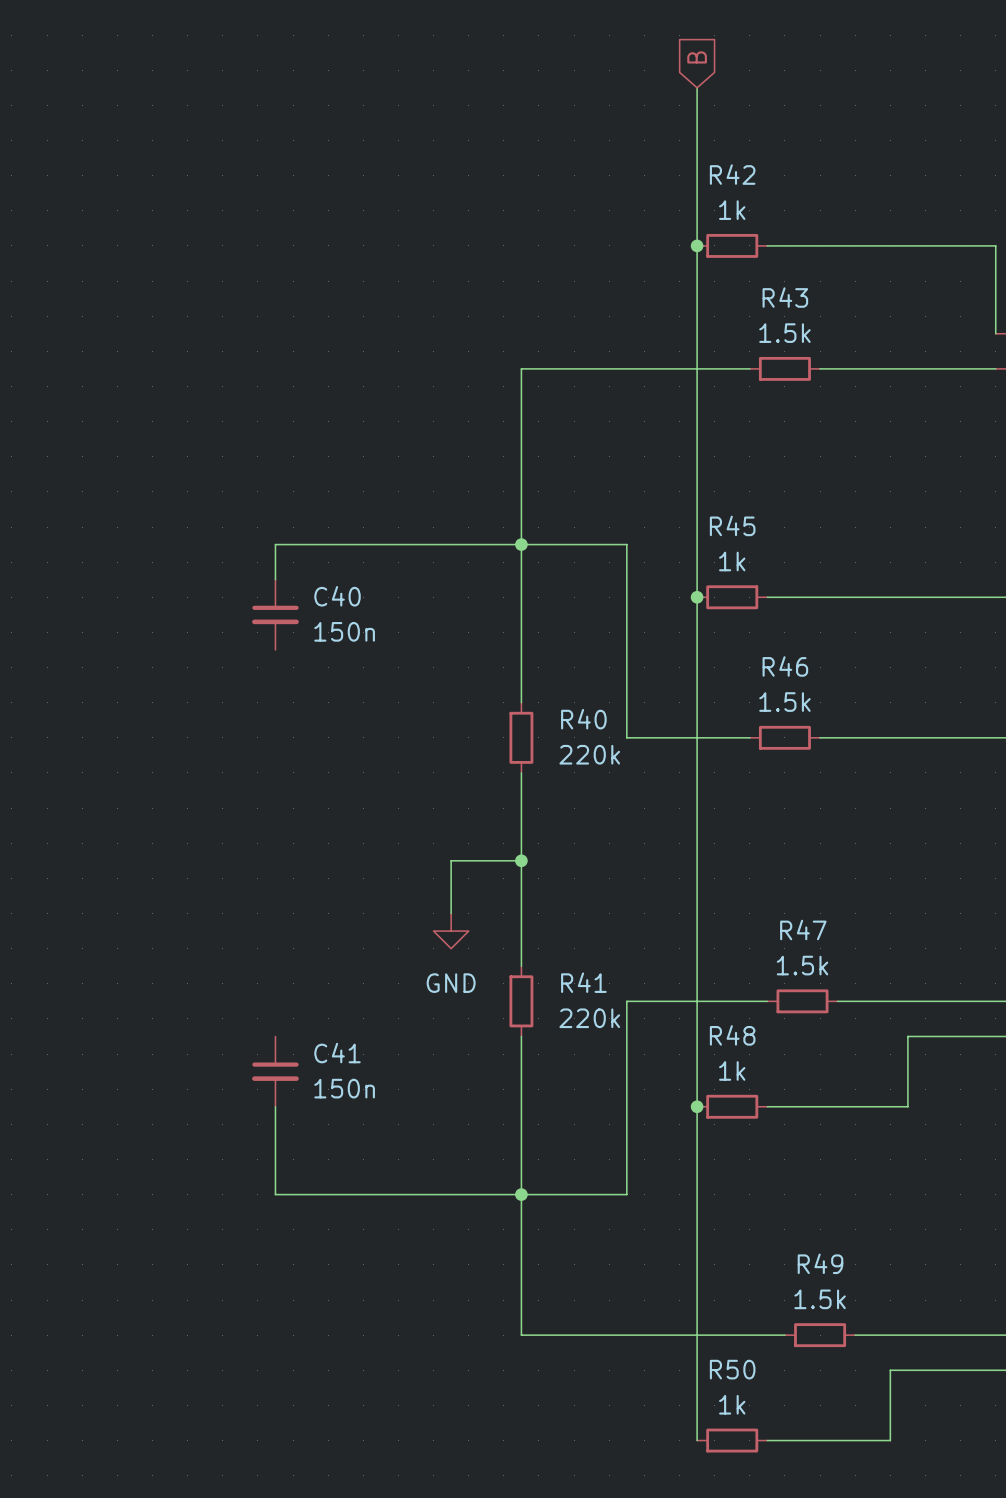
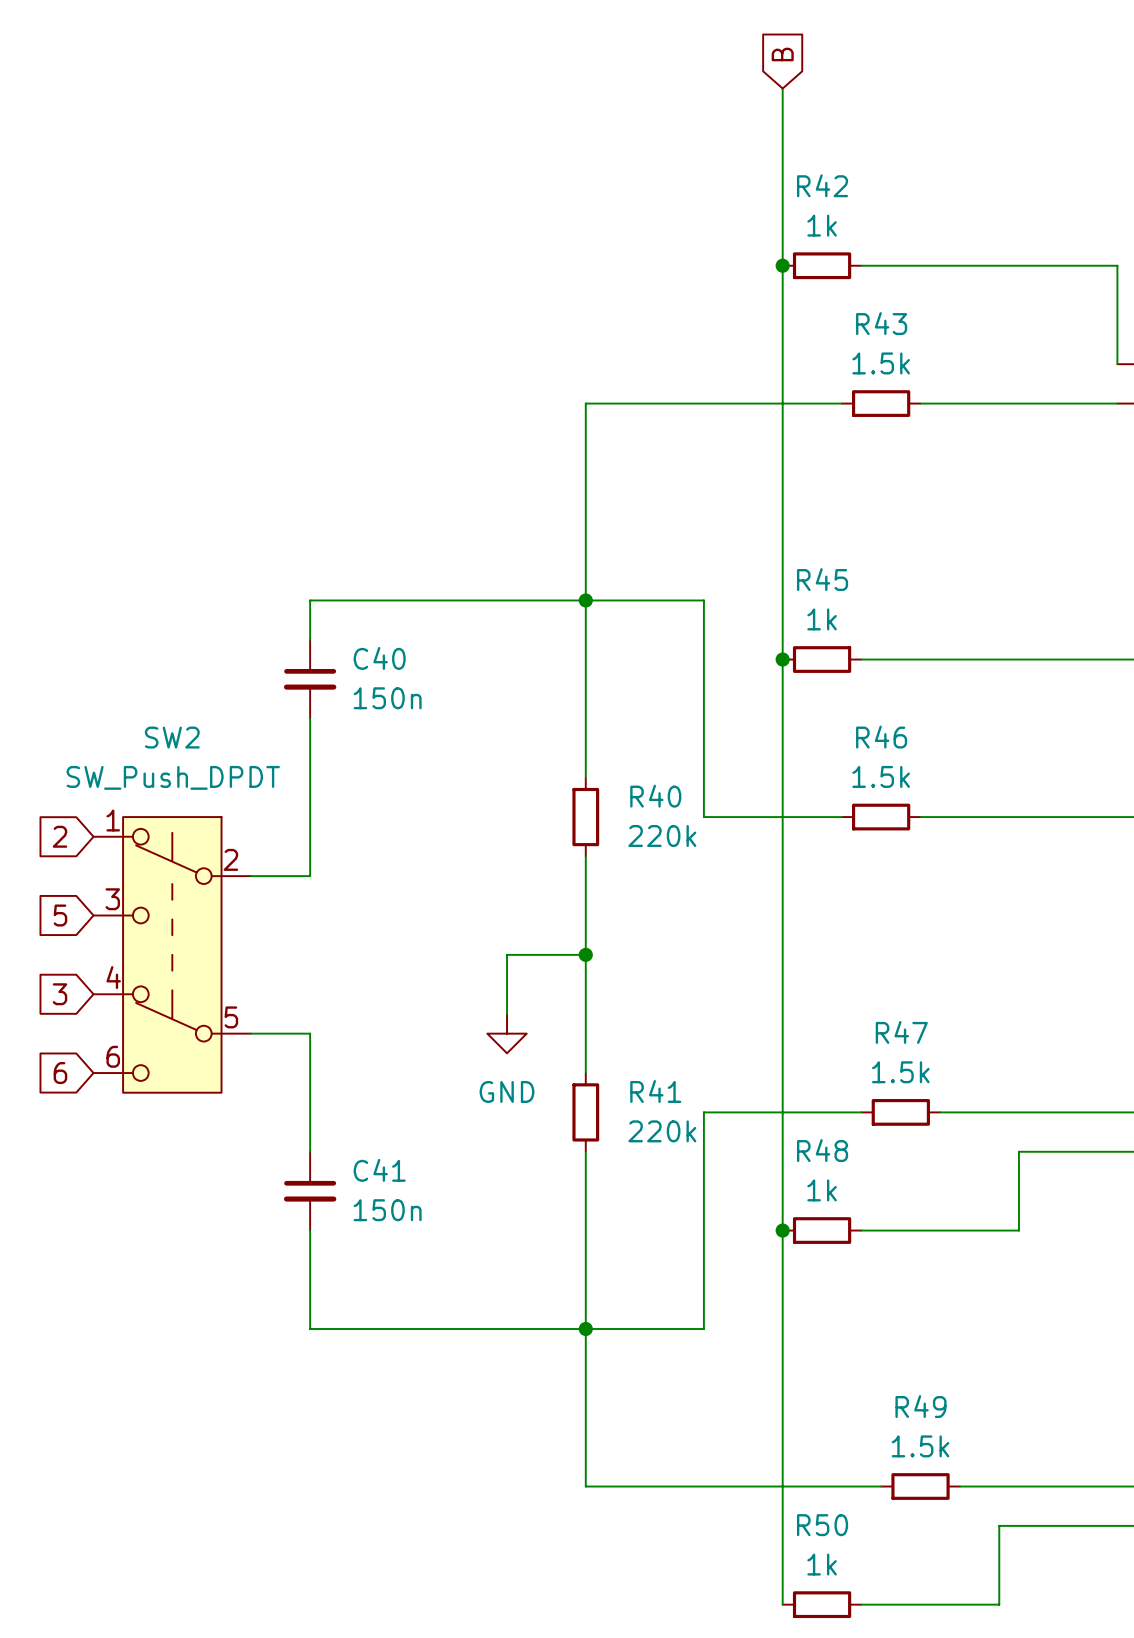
wire: none -> (310, 718) (310, 876) (251, 876)
global label: none -> 2 (59, 836)
global label: none -> 5 (60, 915)
SW2: none -> SW_Push_DPDT (172, 954)
global label: none -> 3 (59, 994)
wire: none -> (251, 1033) (310, 1033) (310, 1151)
global label: none -> 6 (60, 1073)

